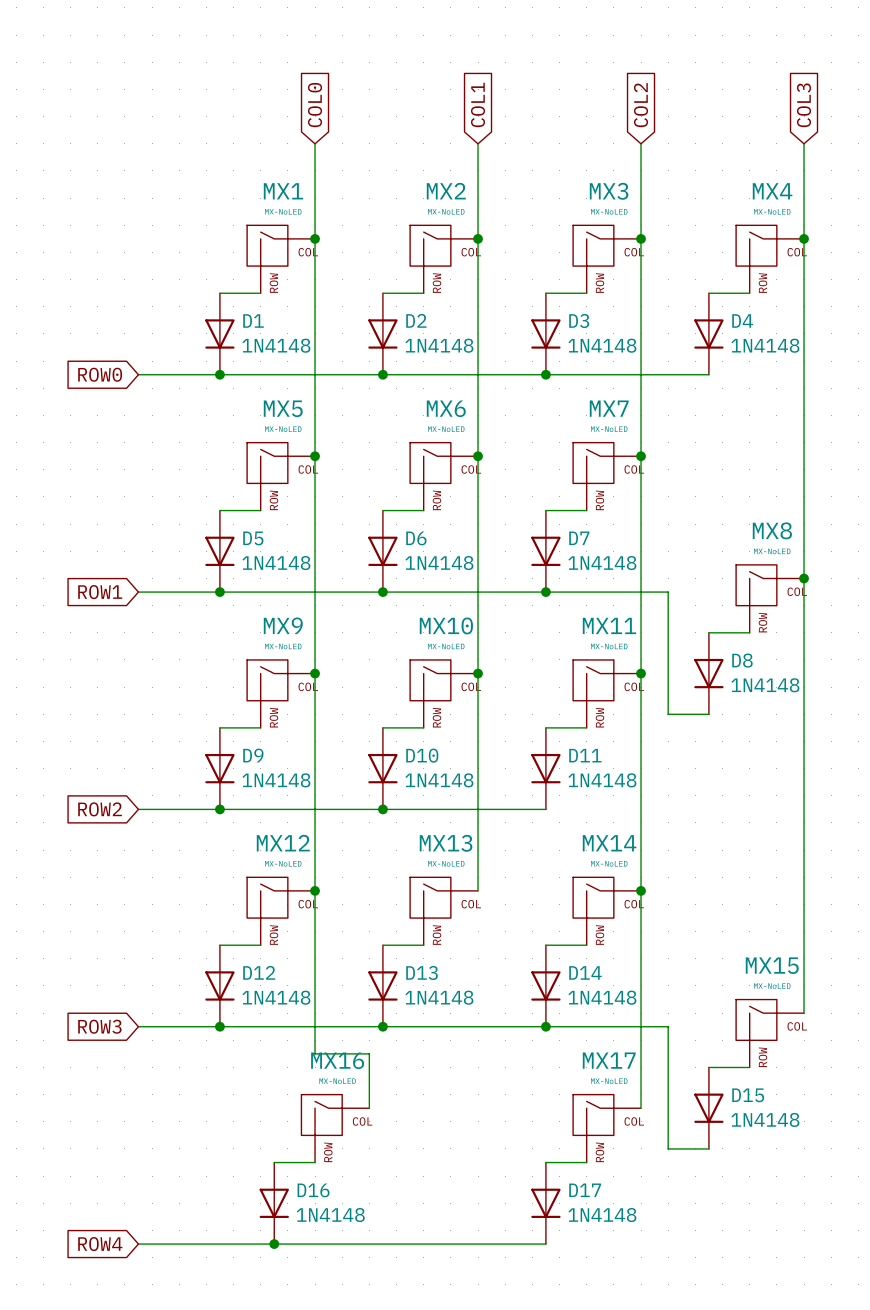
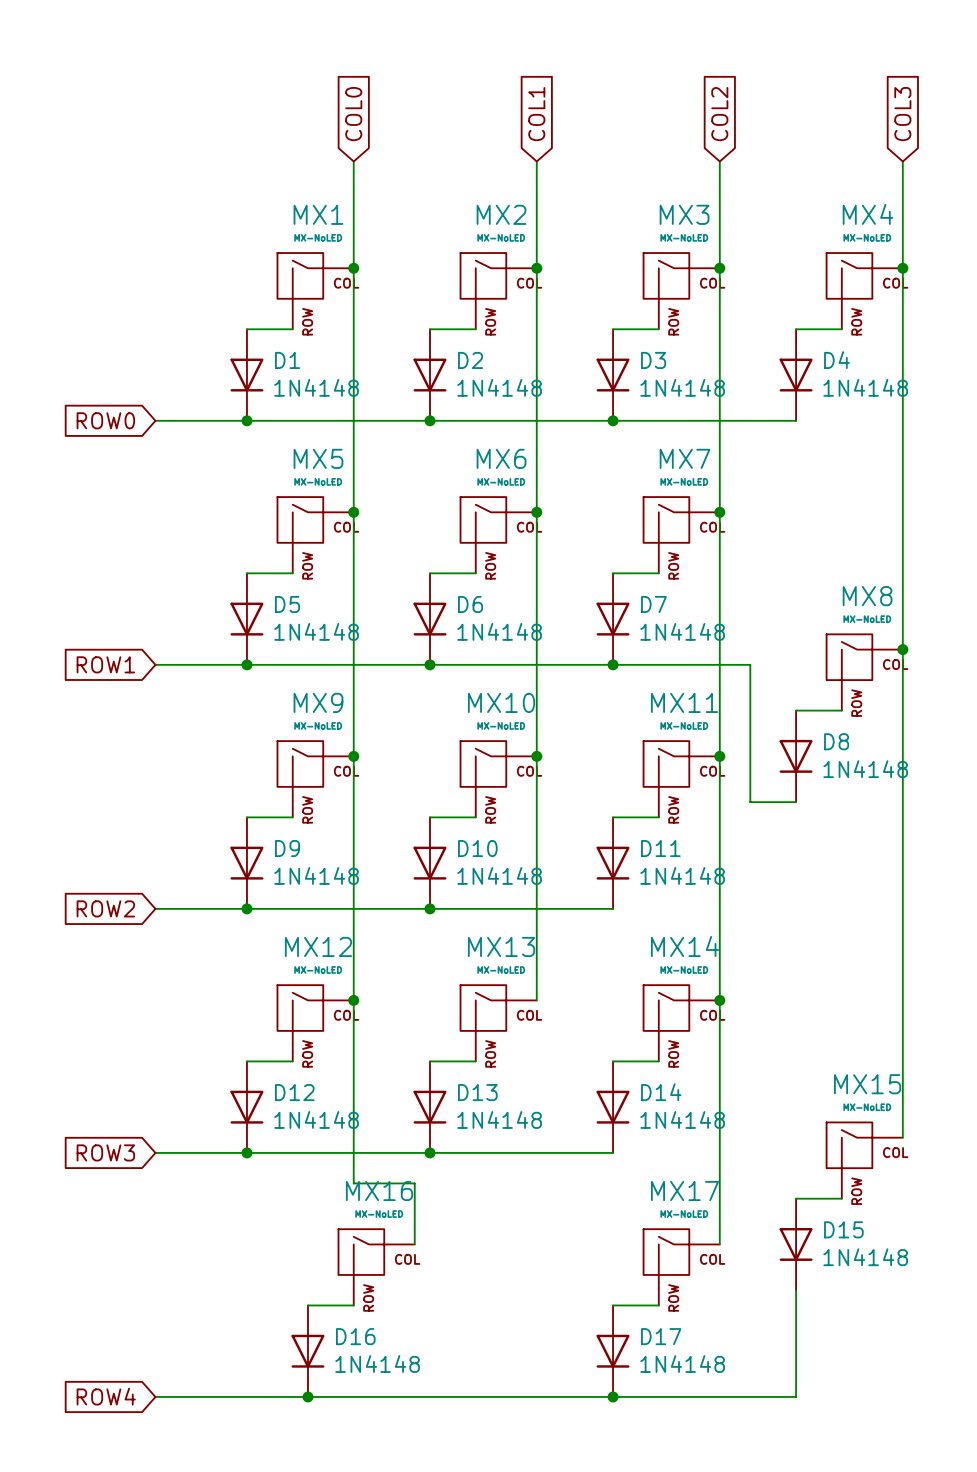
wire: (545, 1026) (668, 1026) (668, 1148) (708, 1148) -> (613, 1396) (796, 1396) (796, 1290)
junction: (545, 1026) -> none
junction: none -> (613, 1396)

